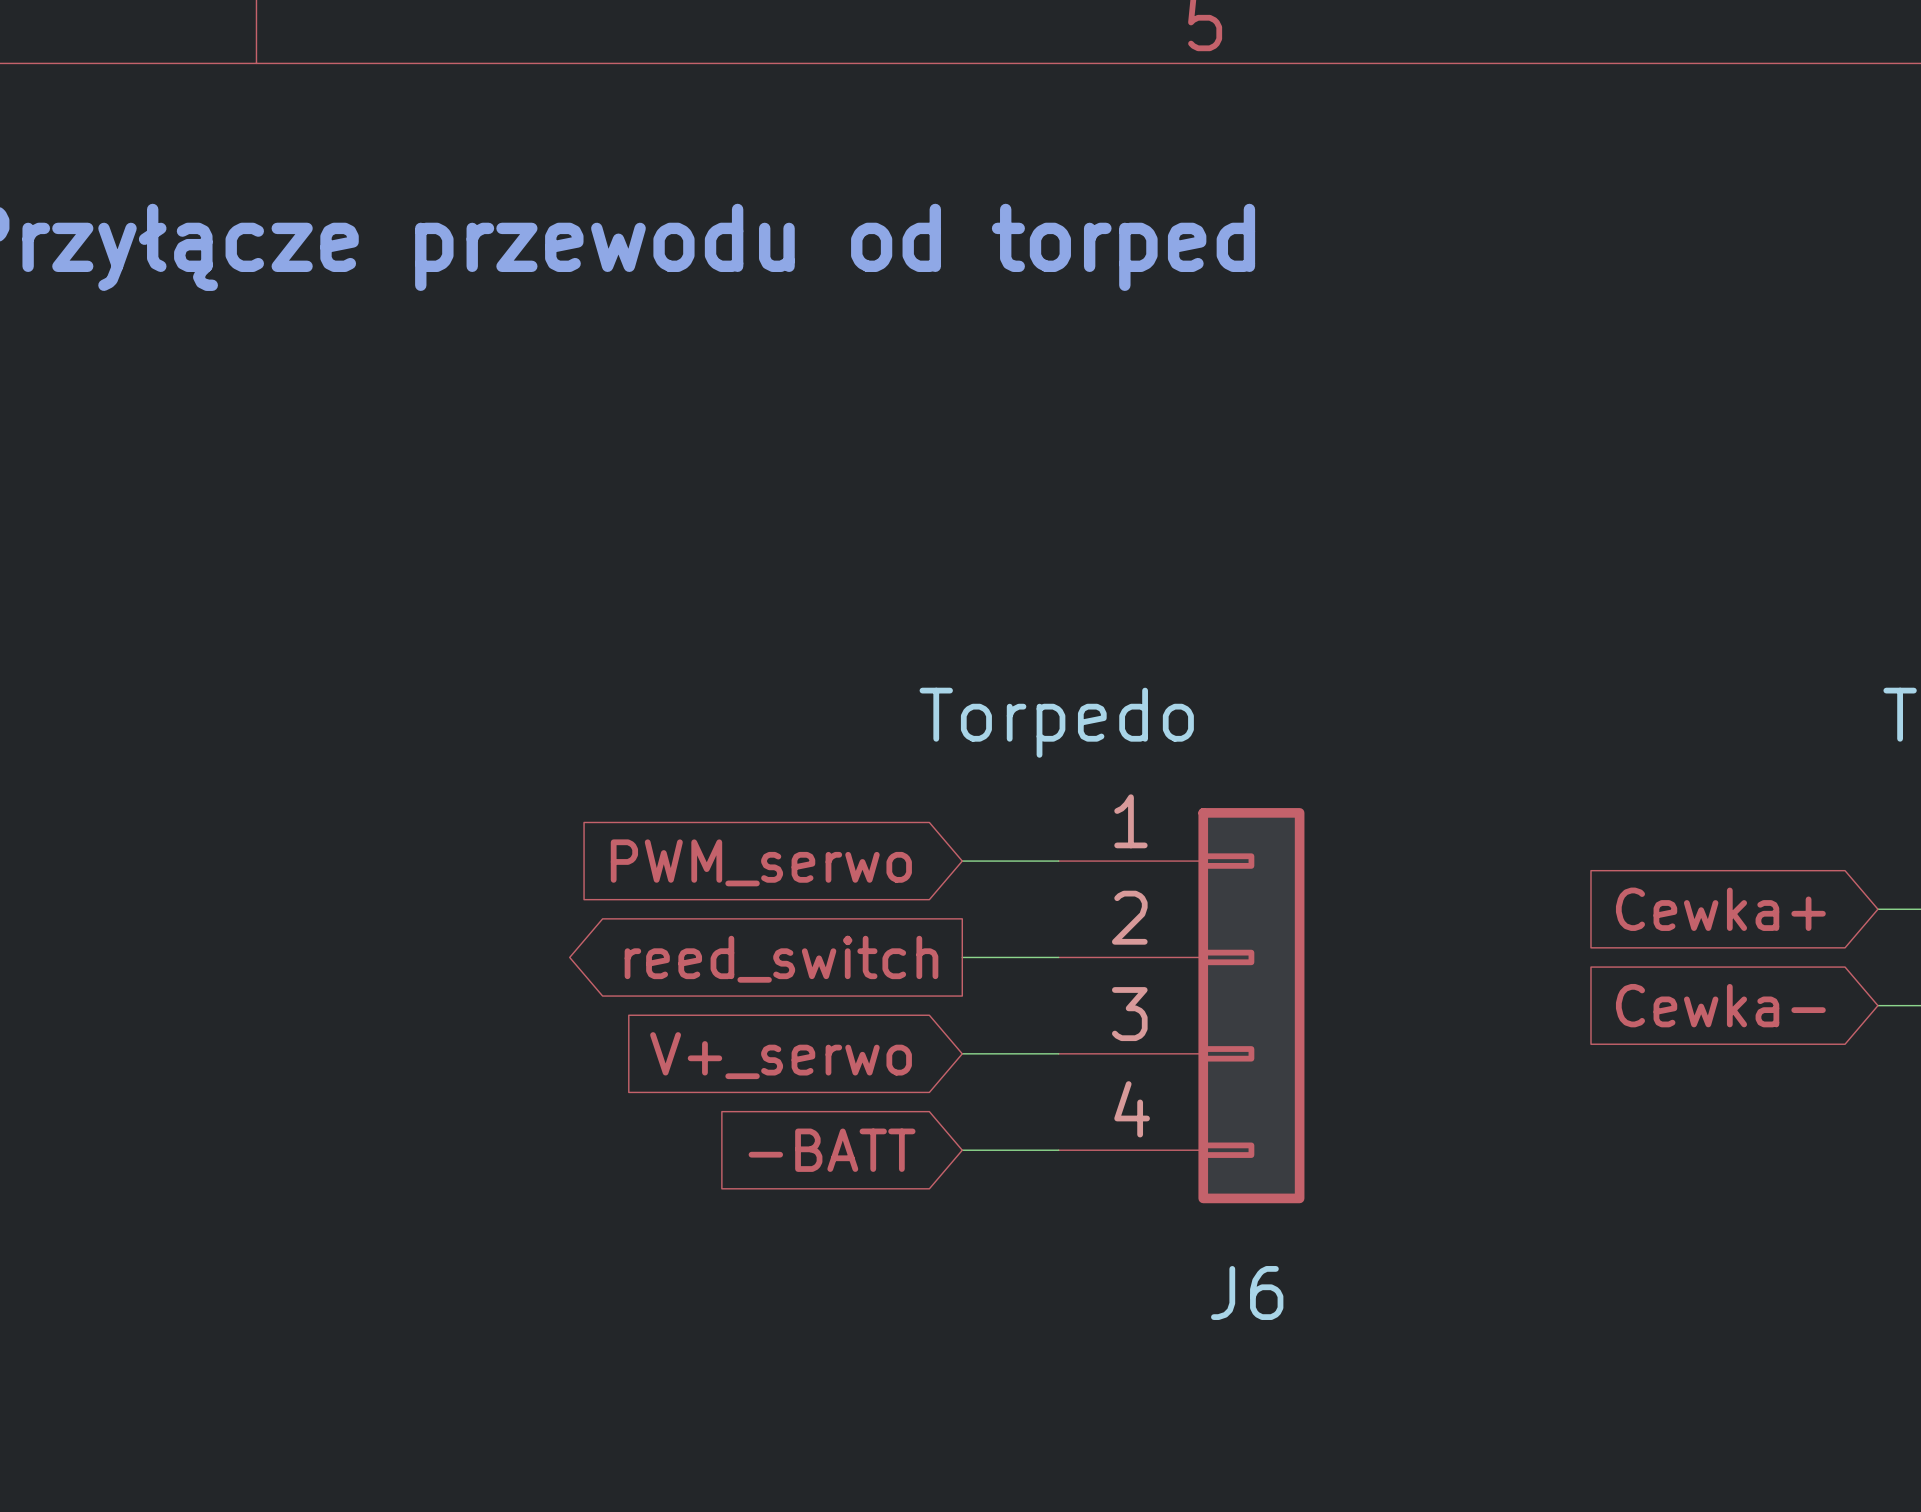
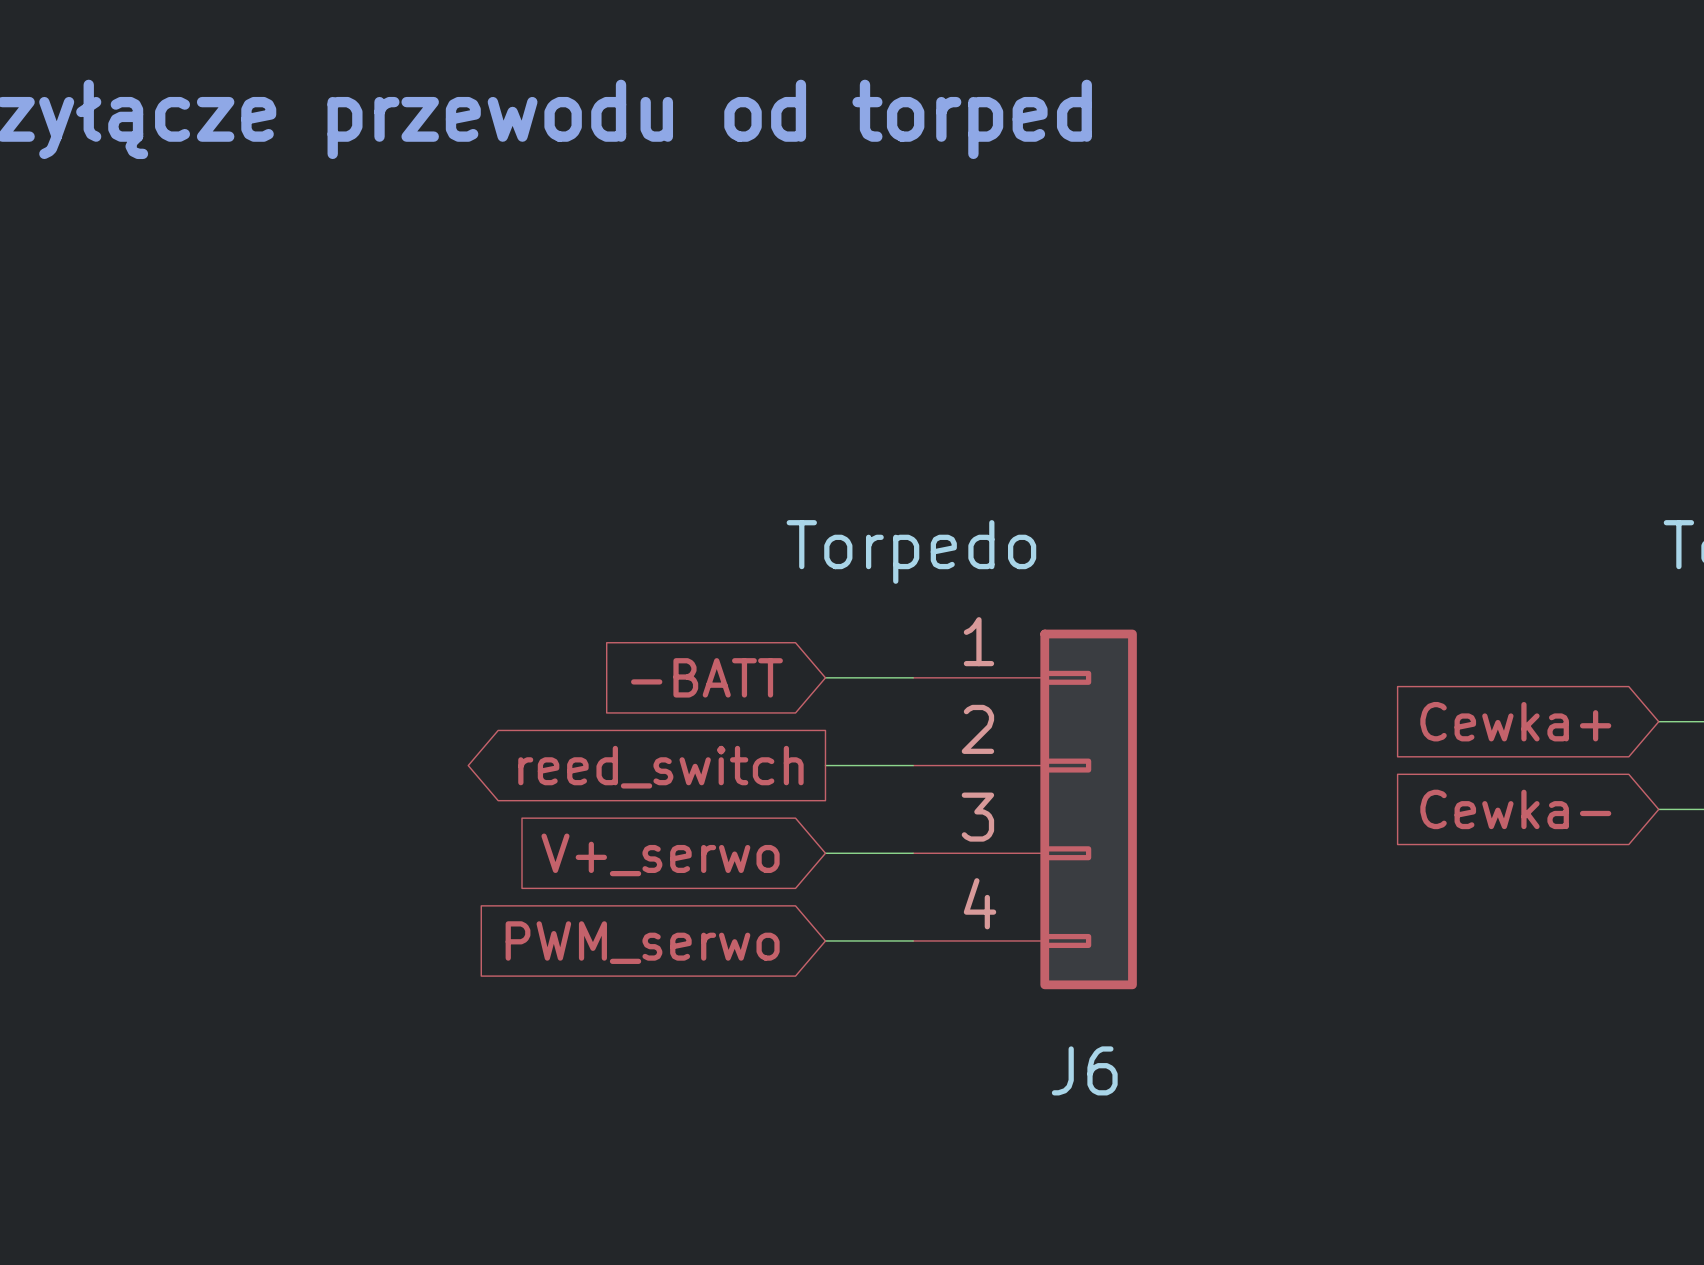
global label: PWM_serwo (761, 862) -> -BATT (706, 677)
global label: -BATT (832, 1150) -> PWM_serwo (642, 942)

